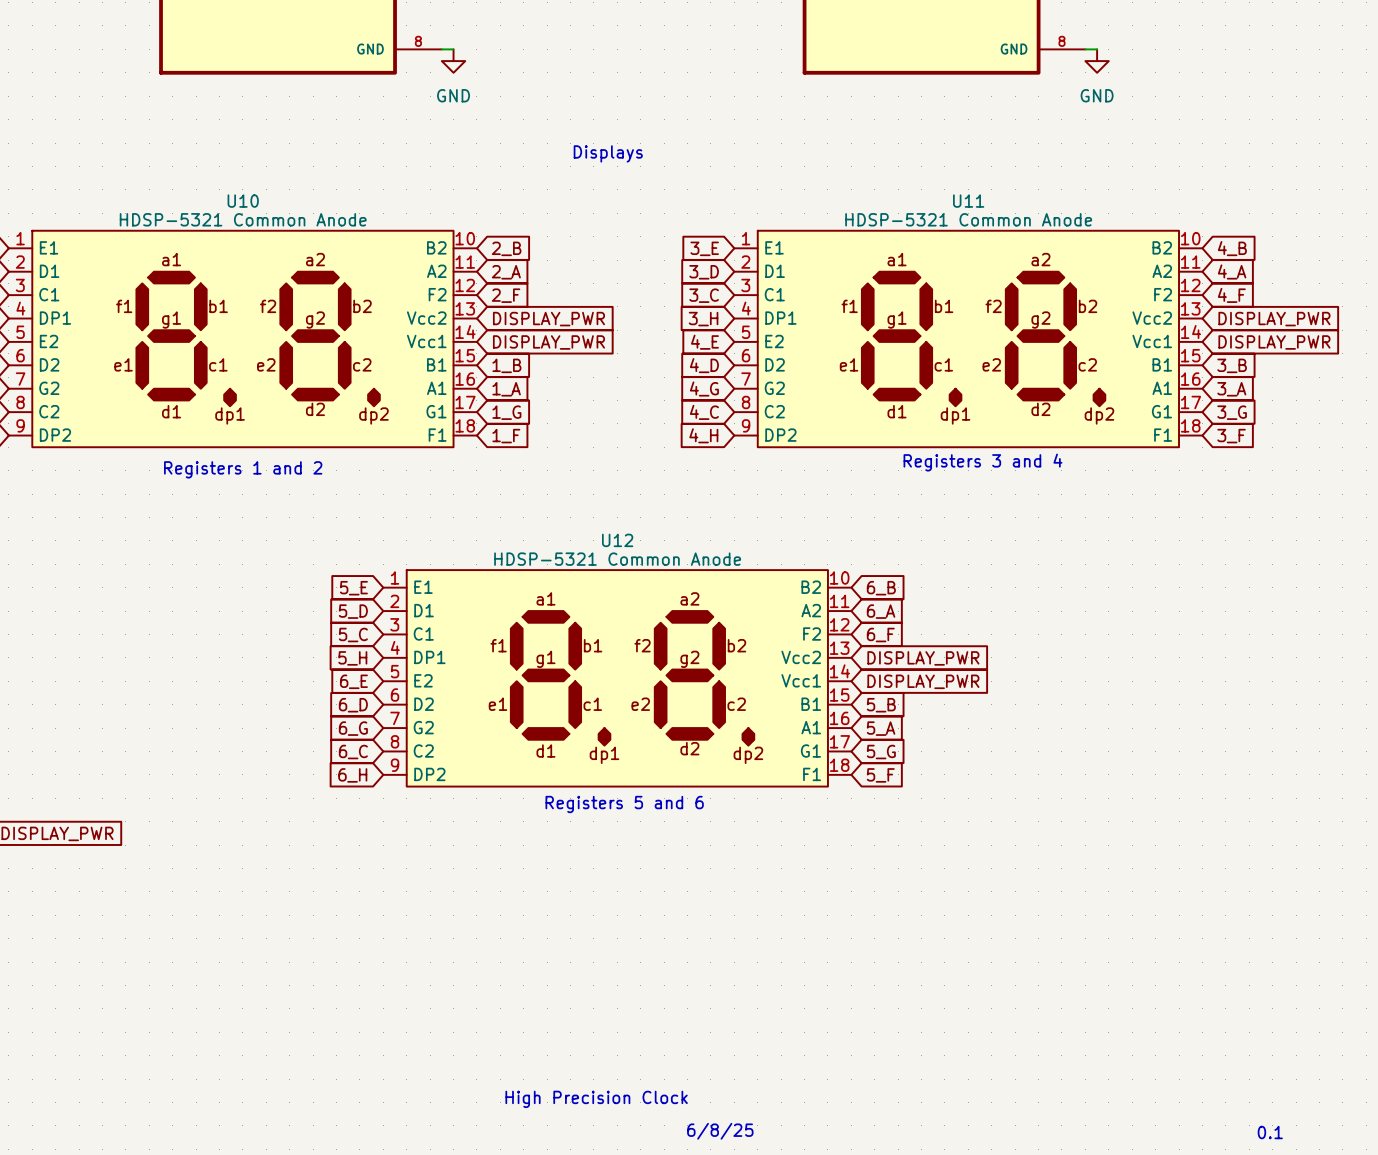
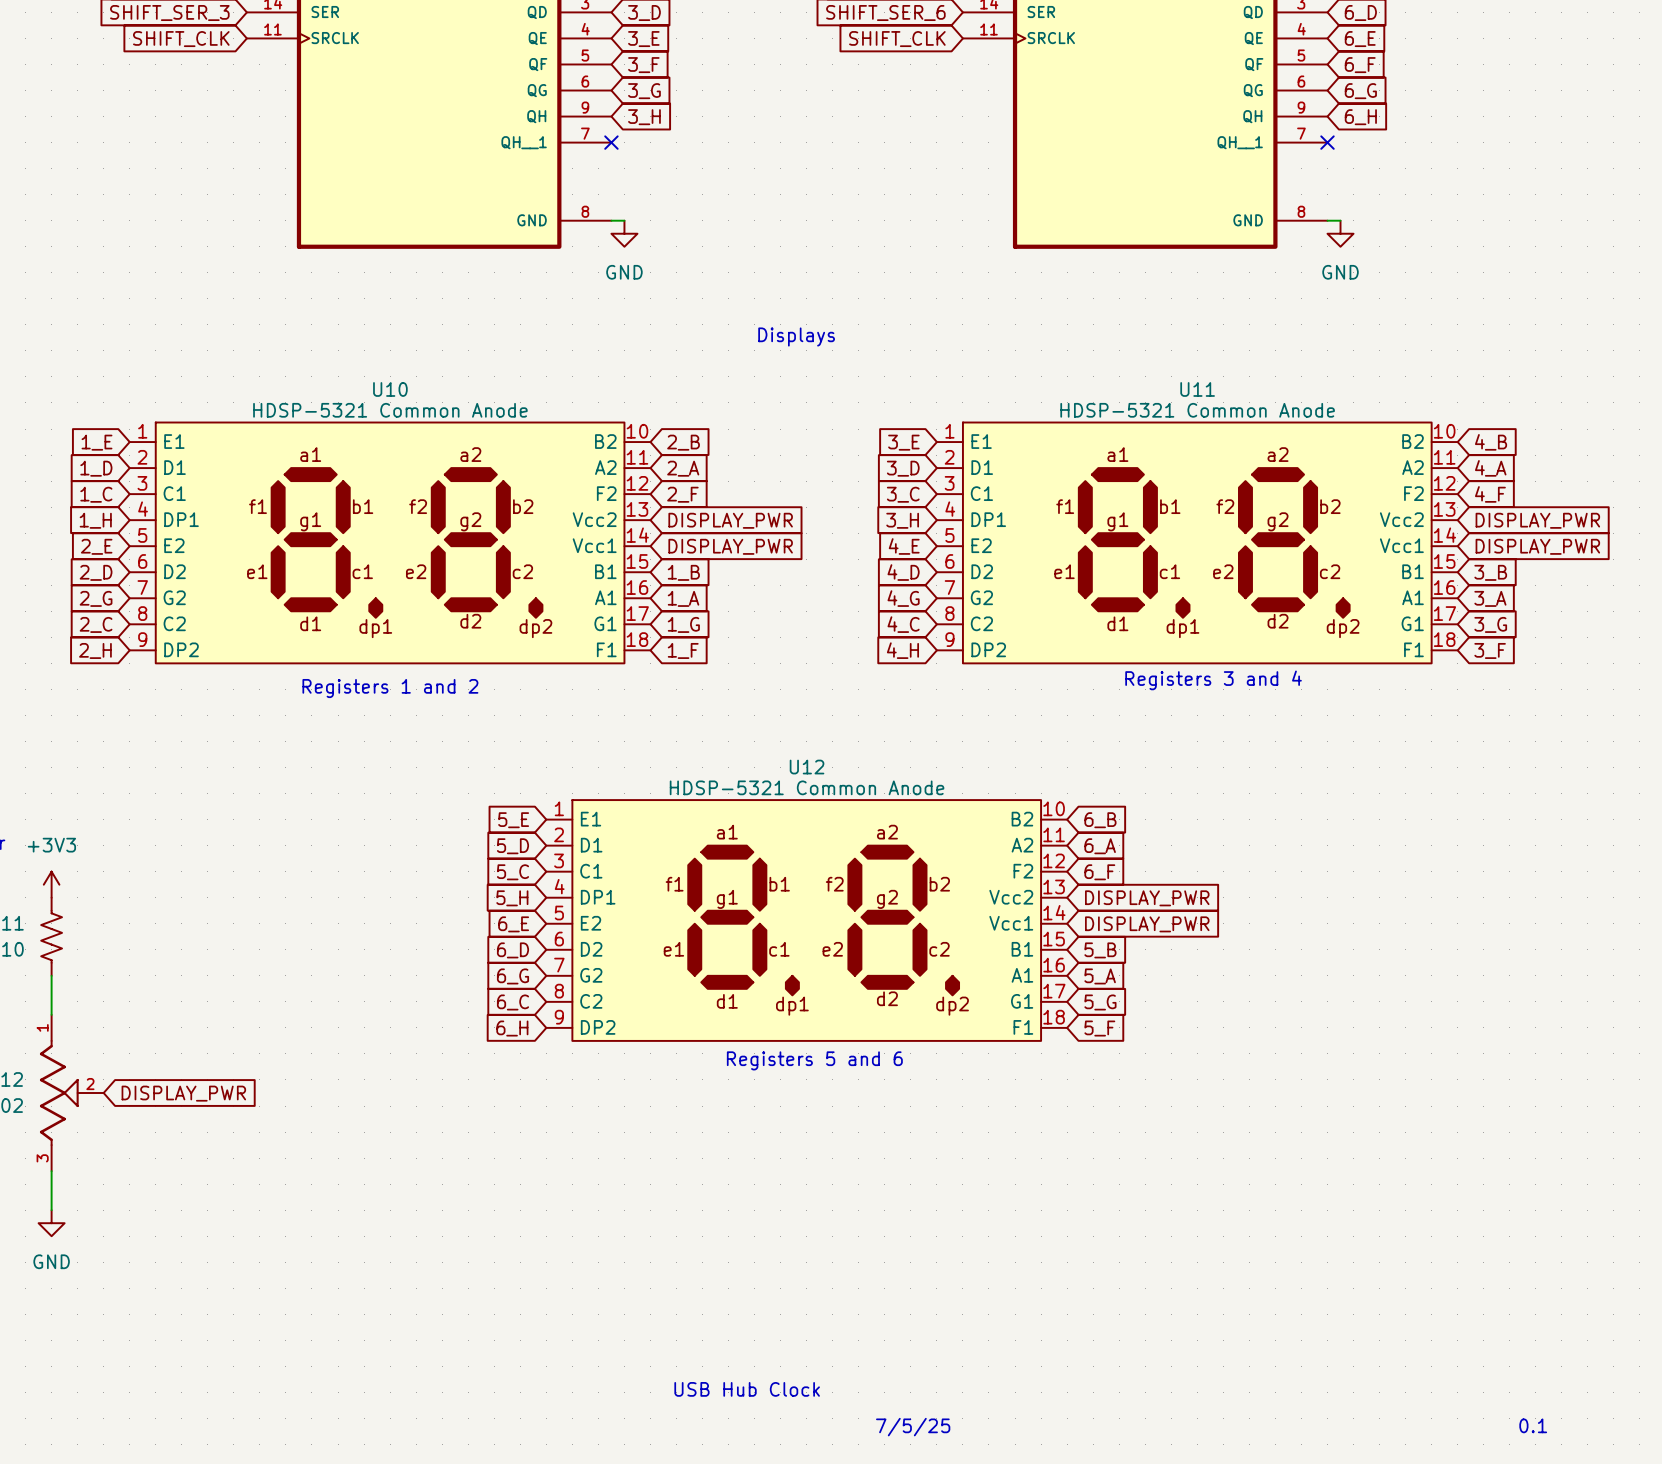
text: none -> USB Hub Clock (747, 1389)
text: High Precision Clock (596, 1099) -> none
text: 6/8/25 (720, 1131) -> 7/5/25 (913, 1427)

